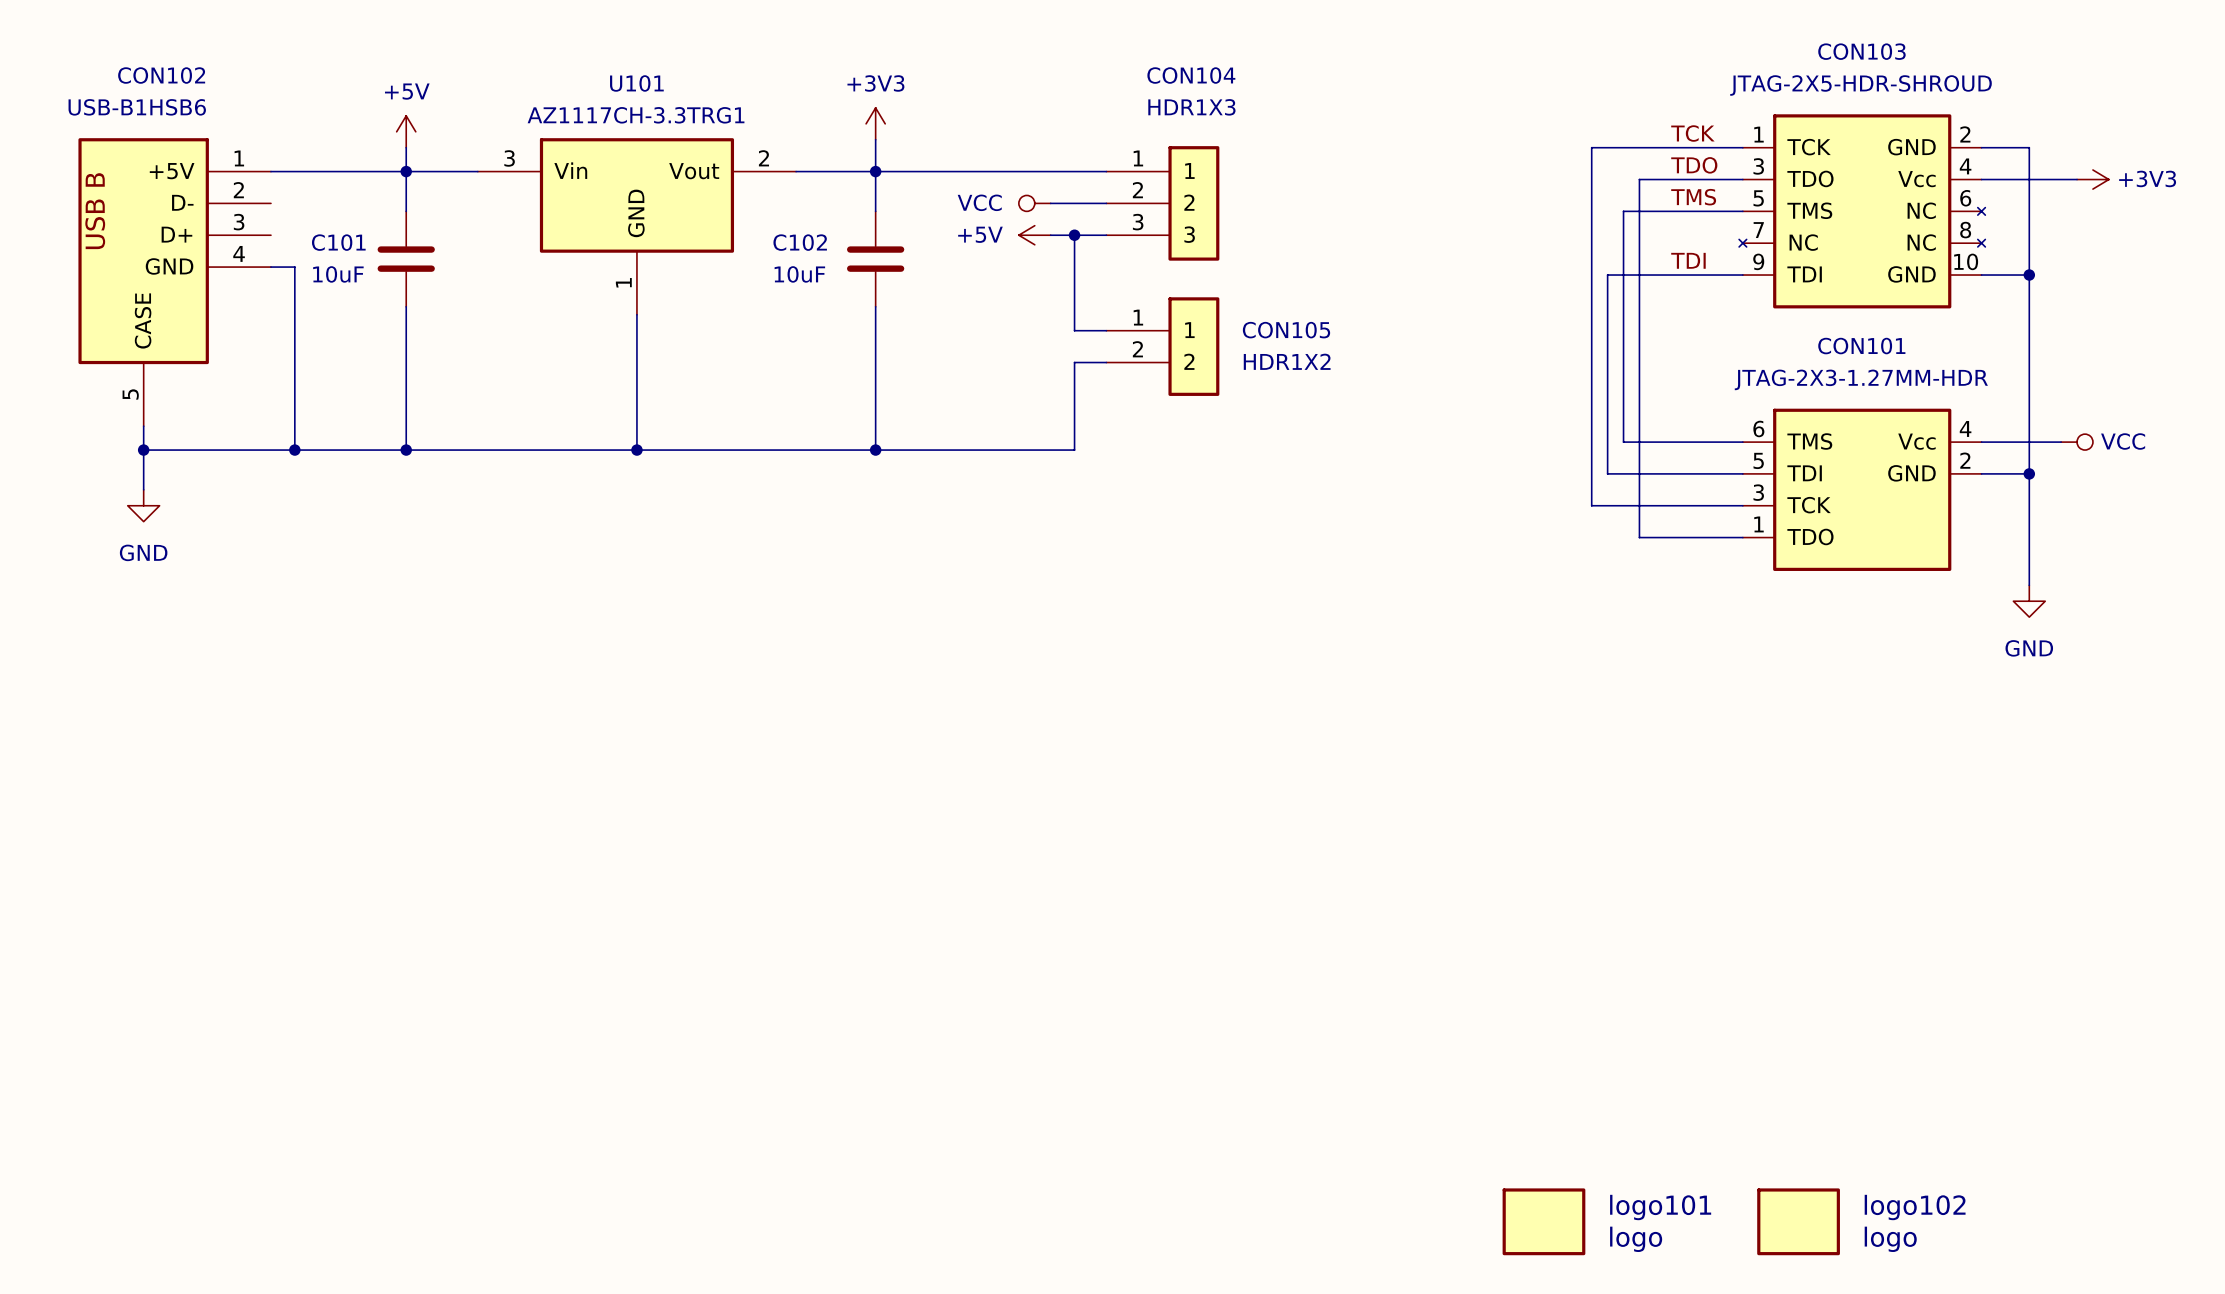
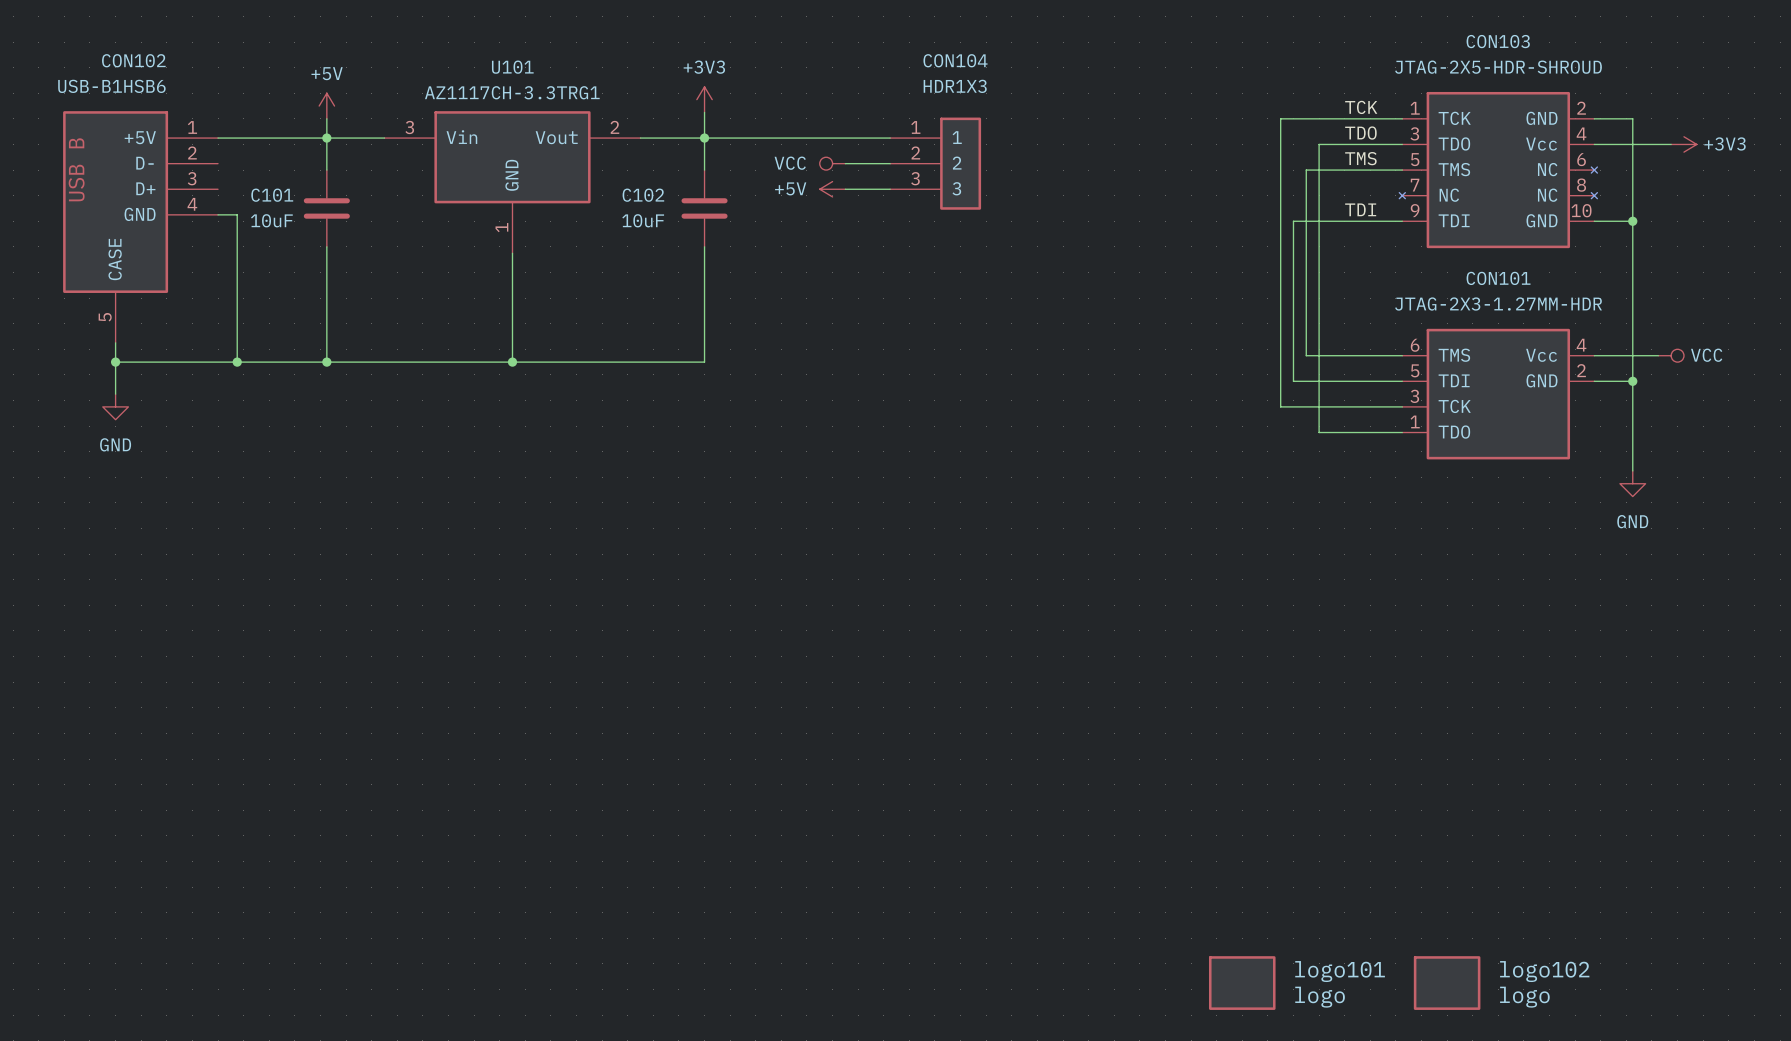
wire: (1074, 235) (1074, 330) (1106, 330) -> none
junction: (1074, 235) -> none
CON105: HDR1X2 (1162, 346) -> none
wire: (1106, 362) (1074, 362) (1074, 450) (875, 450) -> none
junction: (875, 450) -> none

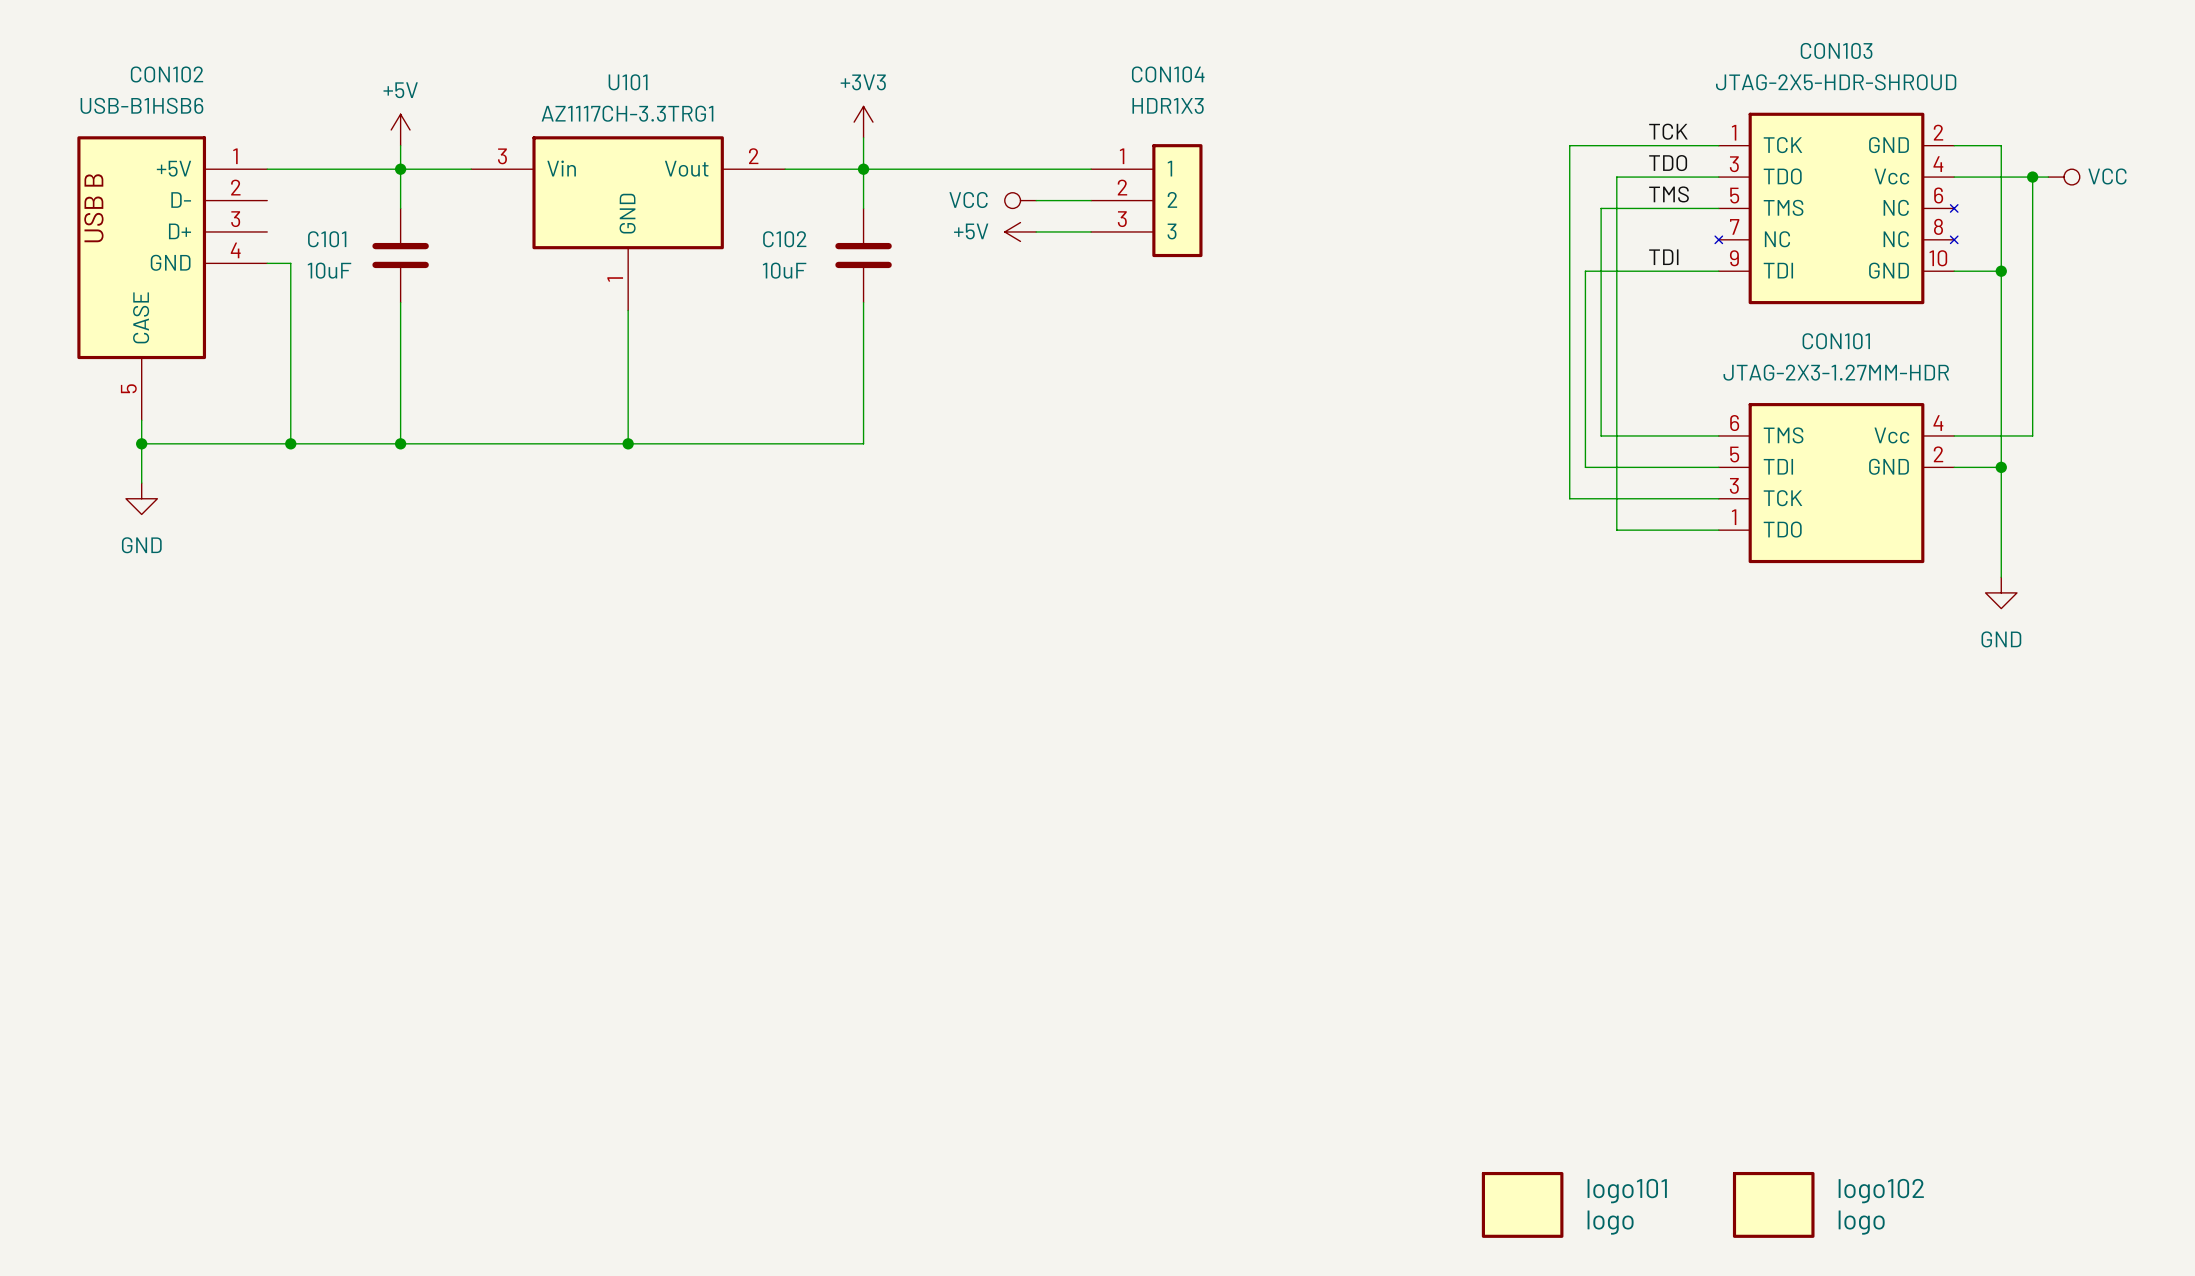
wire: none -> (2032, 177) (2032, 435)
junction: none -> (2032, 177)
power symbol: +3V3 (1683, 144) -> VCC (2064, 177)
power symbol: VCC (1671, 355) -> none

